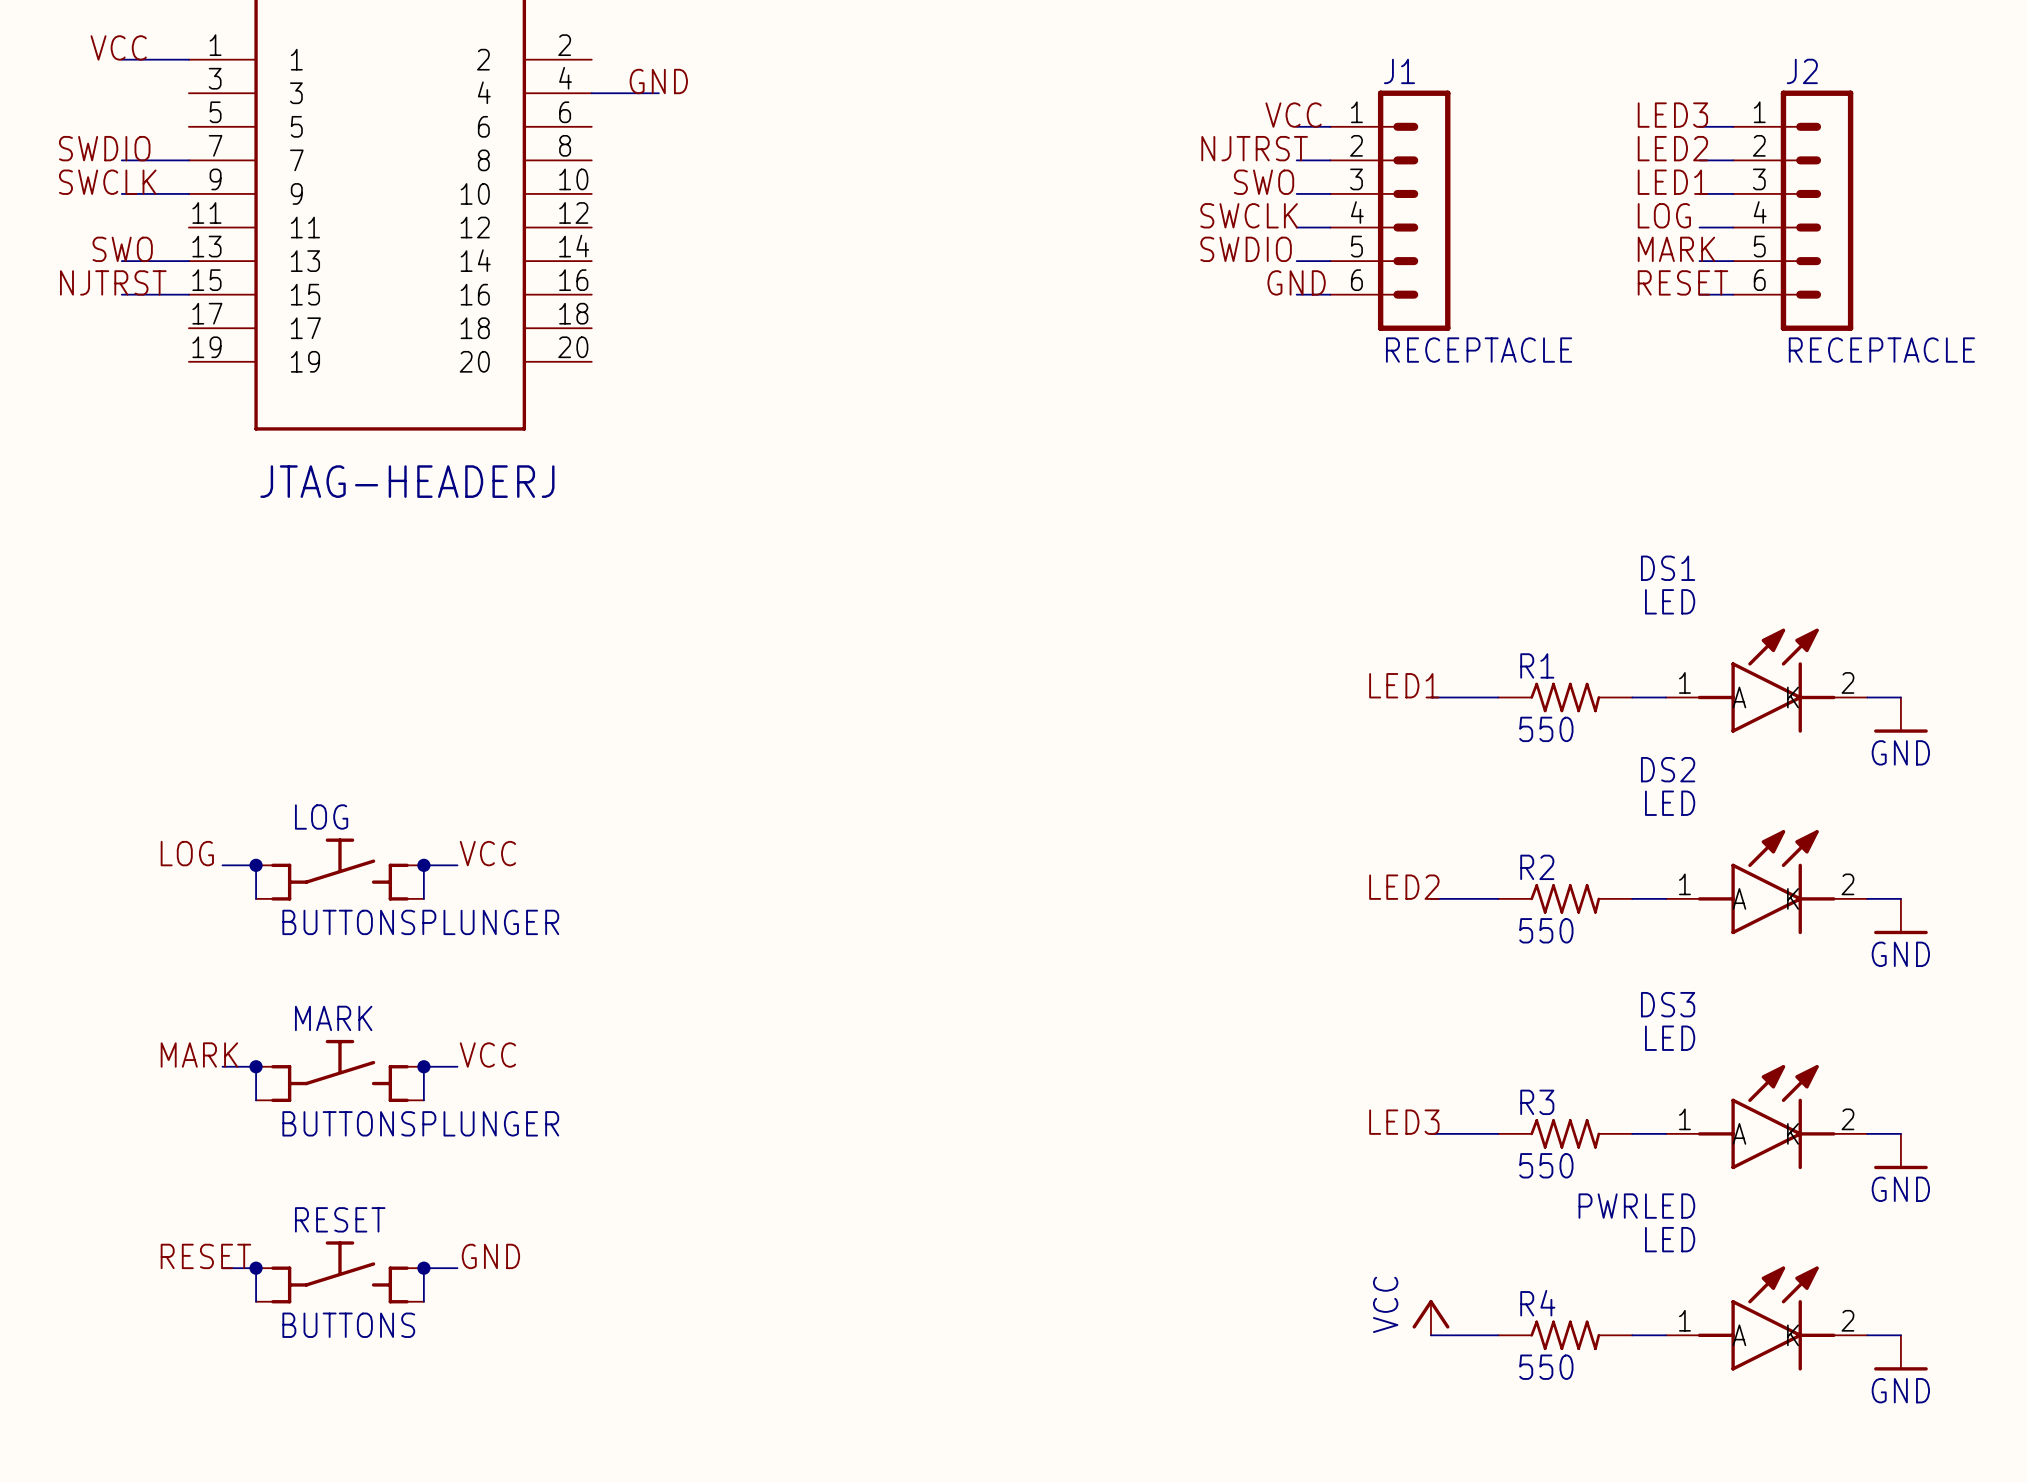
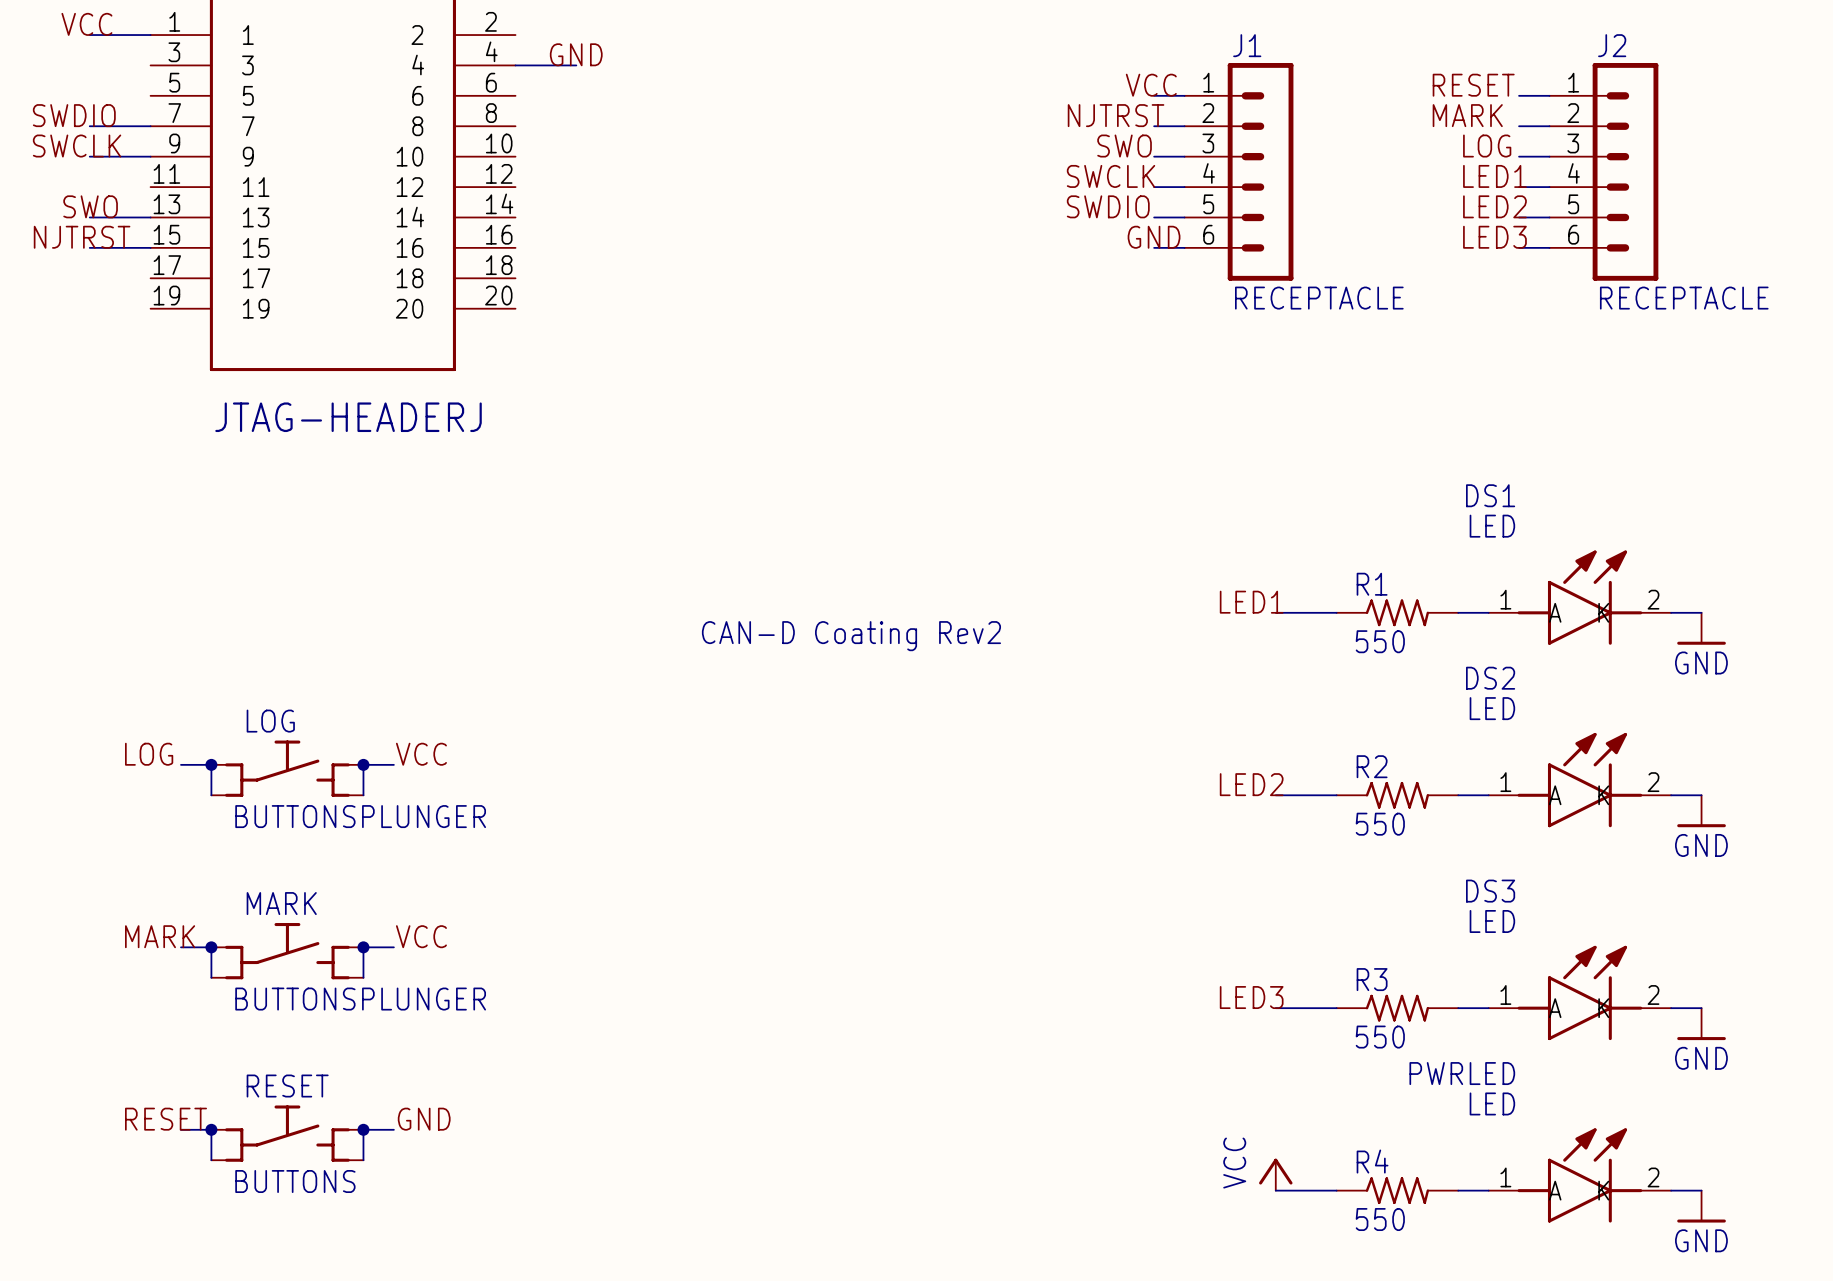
label: none -> RESET (1473, 85)
label: LED3 (1672, 115) -> none
label: none -> MARK (1467, 115)
label: LED2 (1672, 148) -> none
label: LED1 (1672, 182) -> LOG (1487, 146)
label: LOG (1664, 215) -> LED1 (1494, 176)
label: MARK (1676, 249) -> LED2 (1494, 206)
label: RESET (1682, 282) -> LED3 (1494, 237)
text: none -> CAN-D Coating Rev2 (851, 636)

